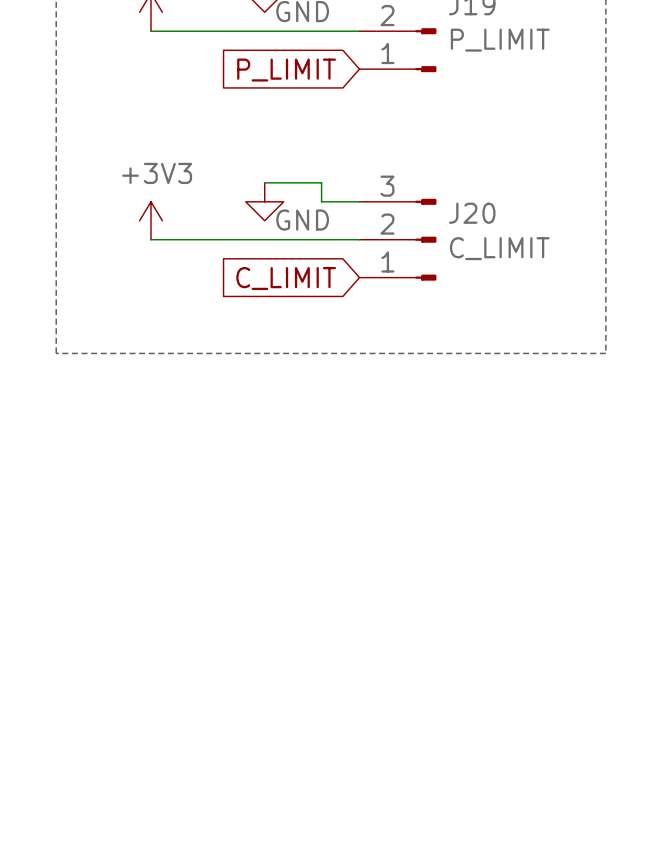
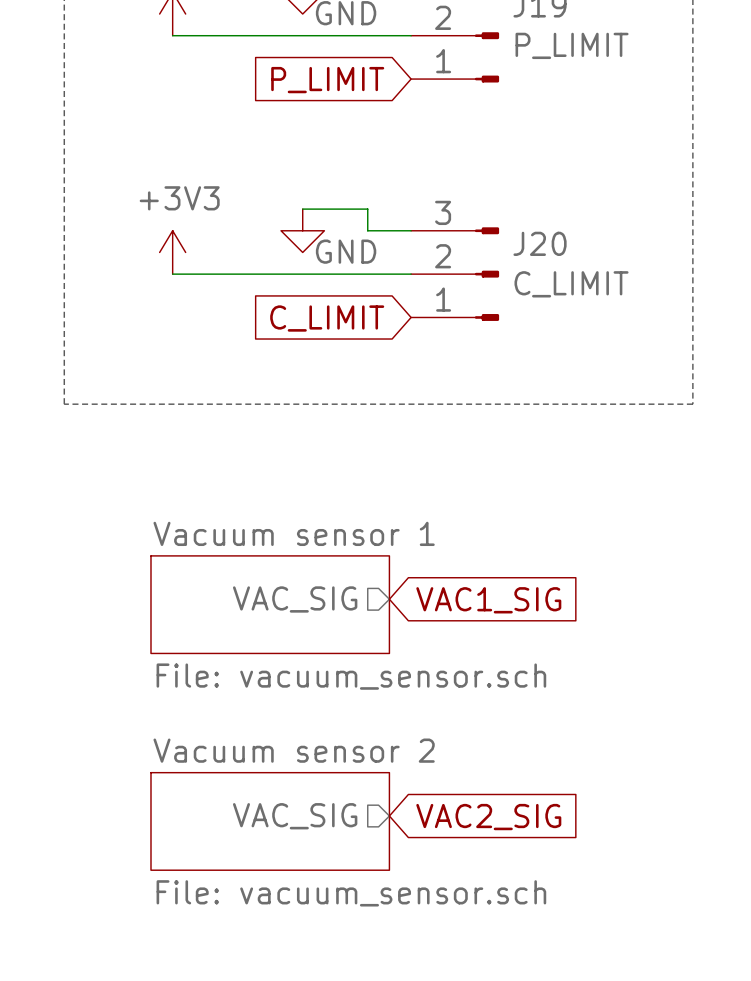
sheet pin: none -> VAC_SIG (295, 599)
global label: none -> VAC1_SIG (488, 600)
sheet Vacuum sensor 1: none -> File: vacuum_sensor.sch (270, 604)
sheet pin: none -> VAC_SIG (295, 816)
global label: none -> VAC2_SIG (488, 817)
sheet Vacuum sensor 2: none -> File: vacuum_sensor.sch (270, 821)

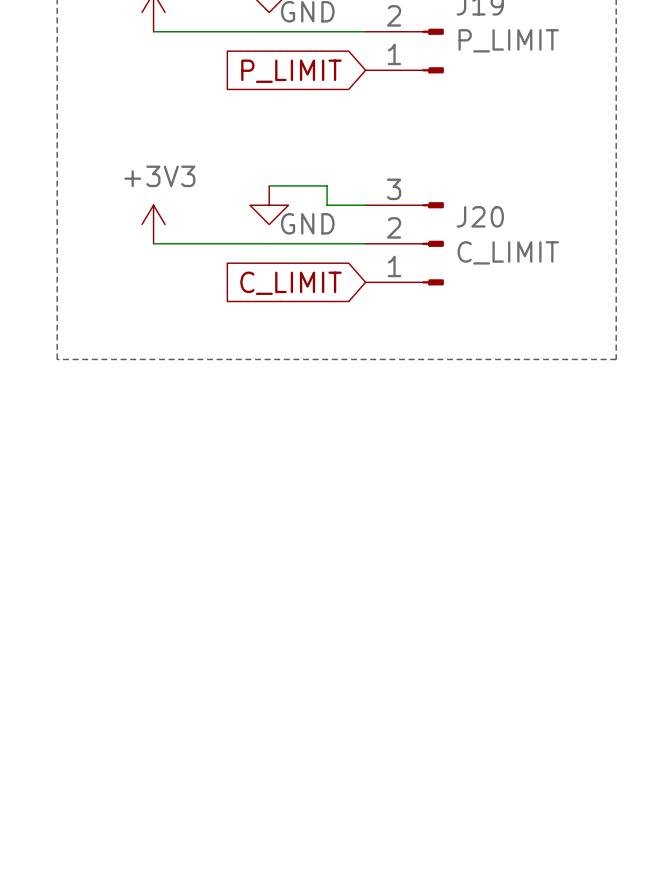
sheet pin: VAC_SIG (295, 599) -> none
global label: VAC1_SIG (488, 600) -> none
sheet Vacuum sensor 1: File: vacuum_sensor.sch (270, 604) -> none
sheet pin: VAC_SIG (295, 816) -> none
global label: VAC2_SIG (488, 817) -> none
sheet Vacuum sensor 2: File: vacuum_sensor.sch (270, 821) -> none

